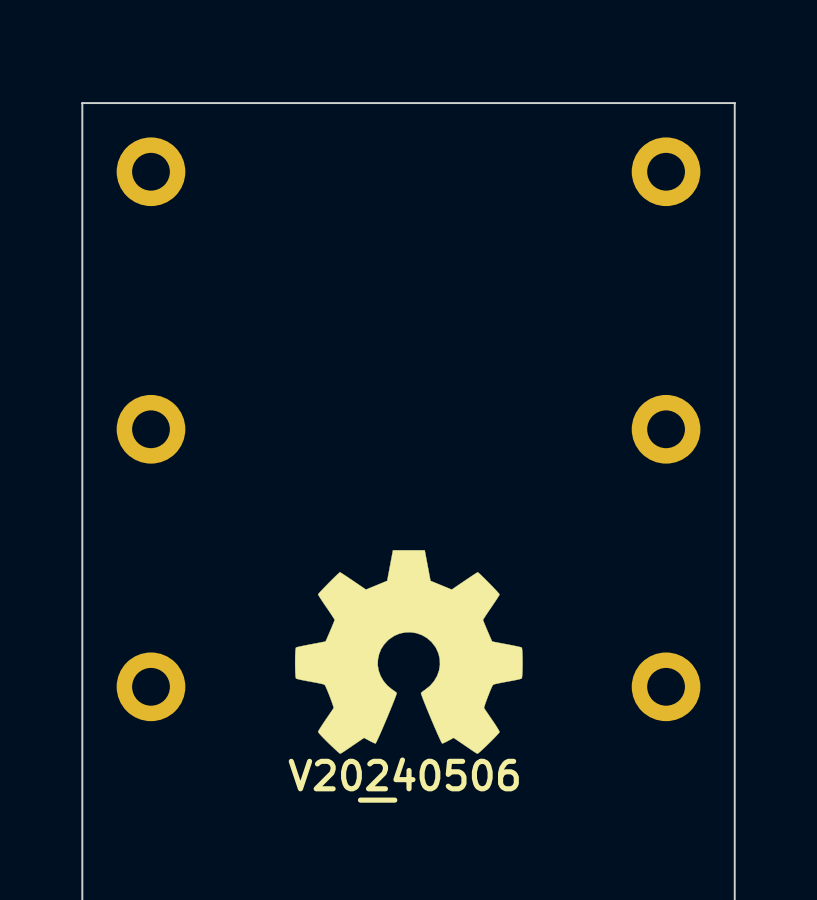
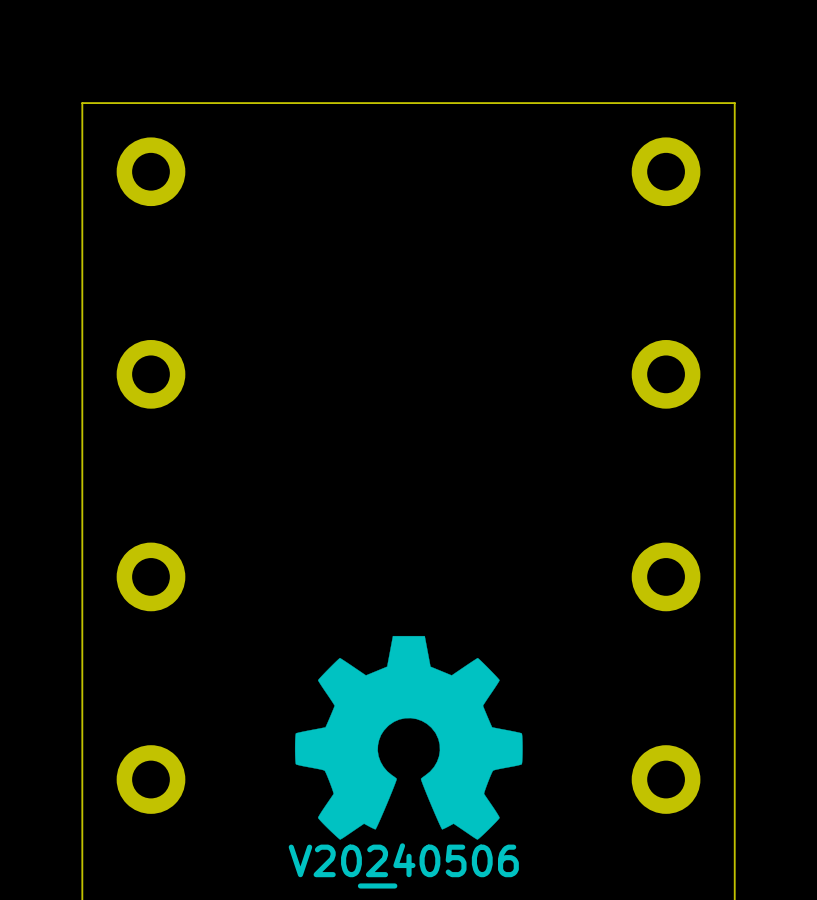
part position: (150, 429) -> (150, 374)
part position: (666, 429) -> (666, 374)
part: none -> (150, 576)
part: none -> (666, 576)
drawing position: (408, 652) -> (408, 737)
part: (150, 686) -> none
part: (666, 686) -> none
part: none -> (150, 779)
part: none -> (666, 779)
drawing position: (377, 800) -> (377, 885)

